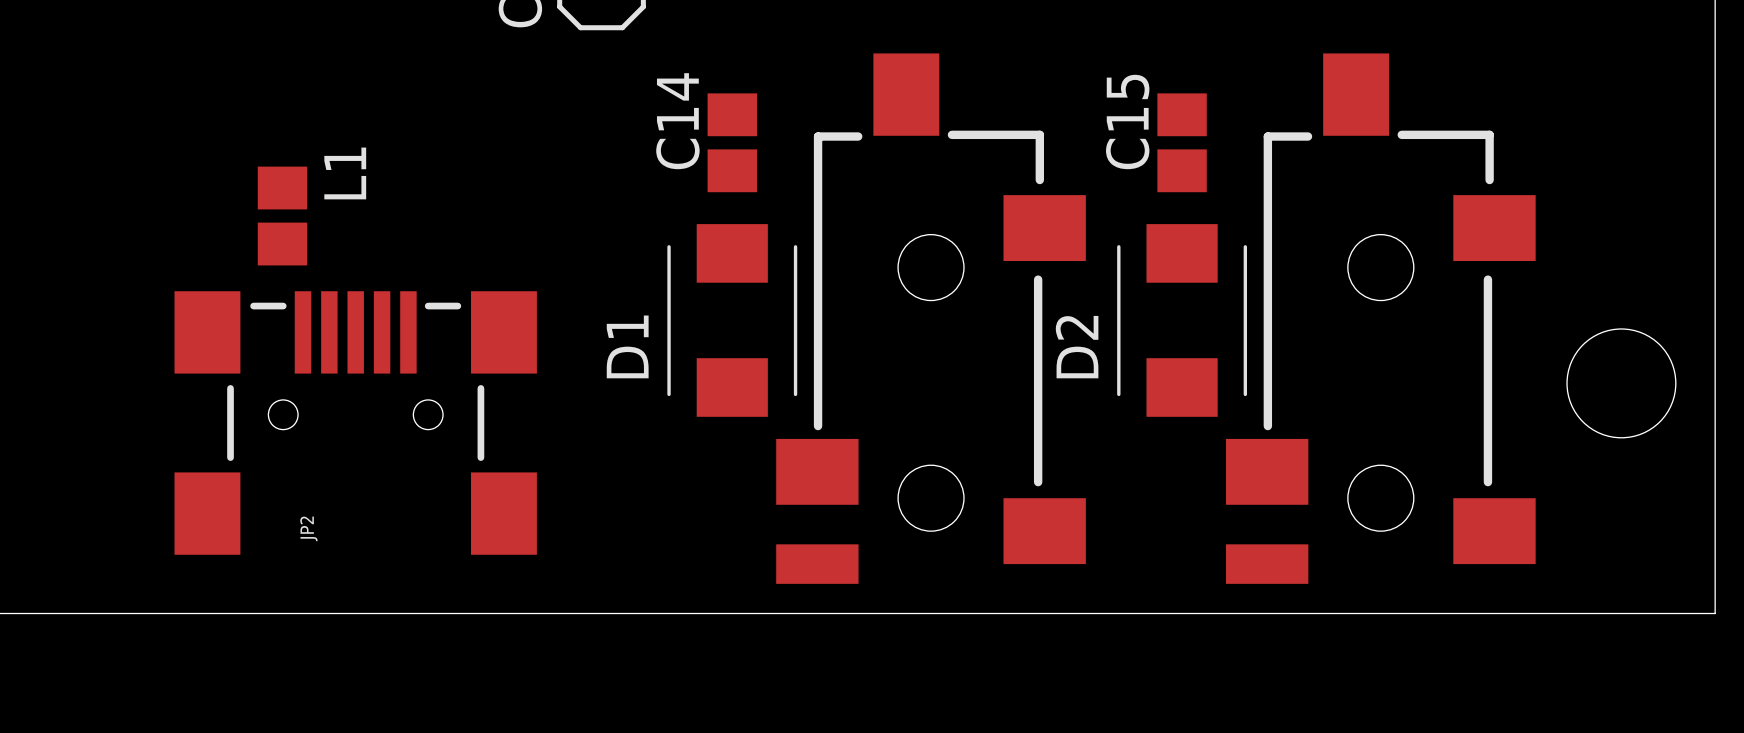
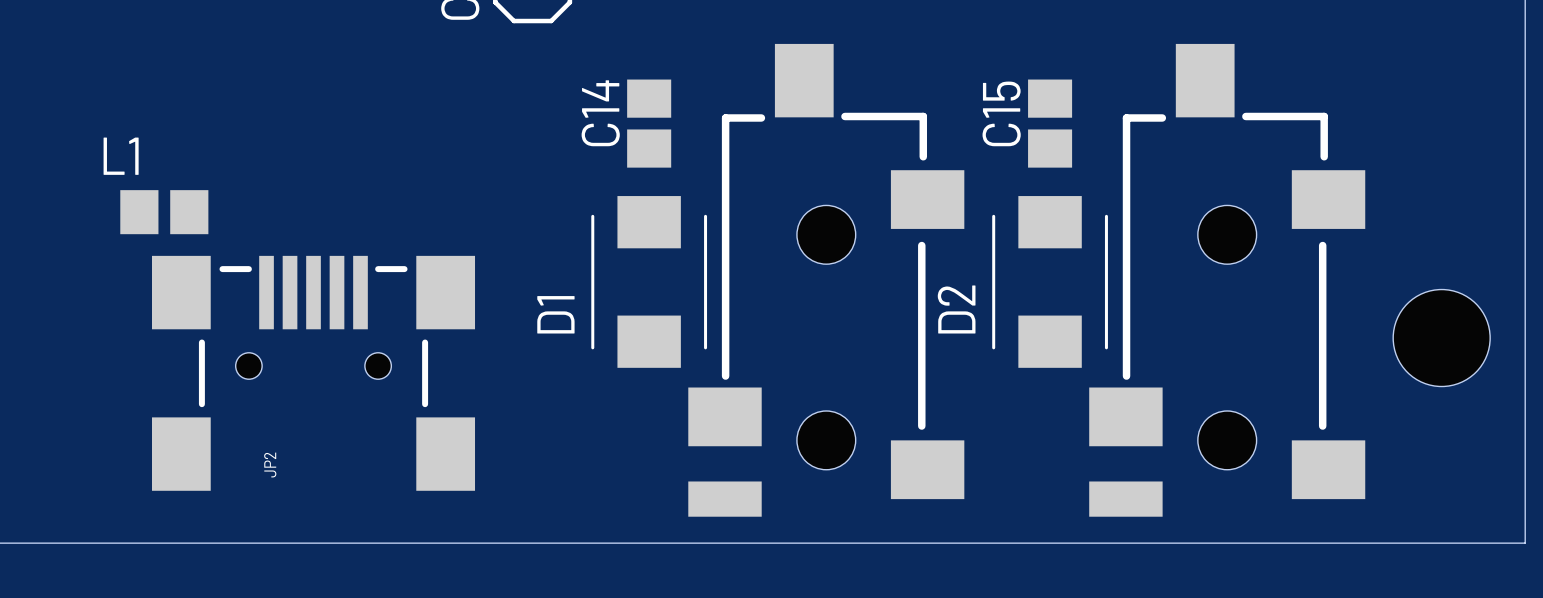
L1 name position: L1 (345, 173) -> L1 (121, 156)
L1 rotation: 0° (282, 216) -> 90° clockwise (164, 212)
L1 position: (282, 216) -> (164, 212)

